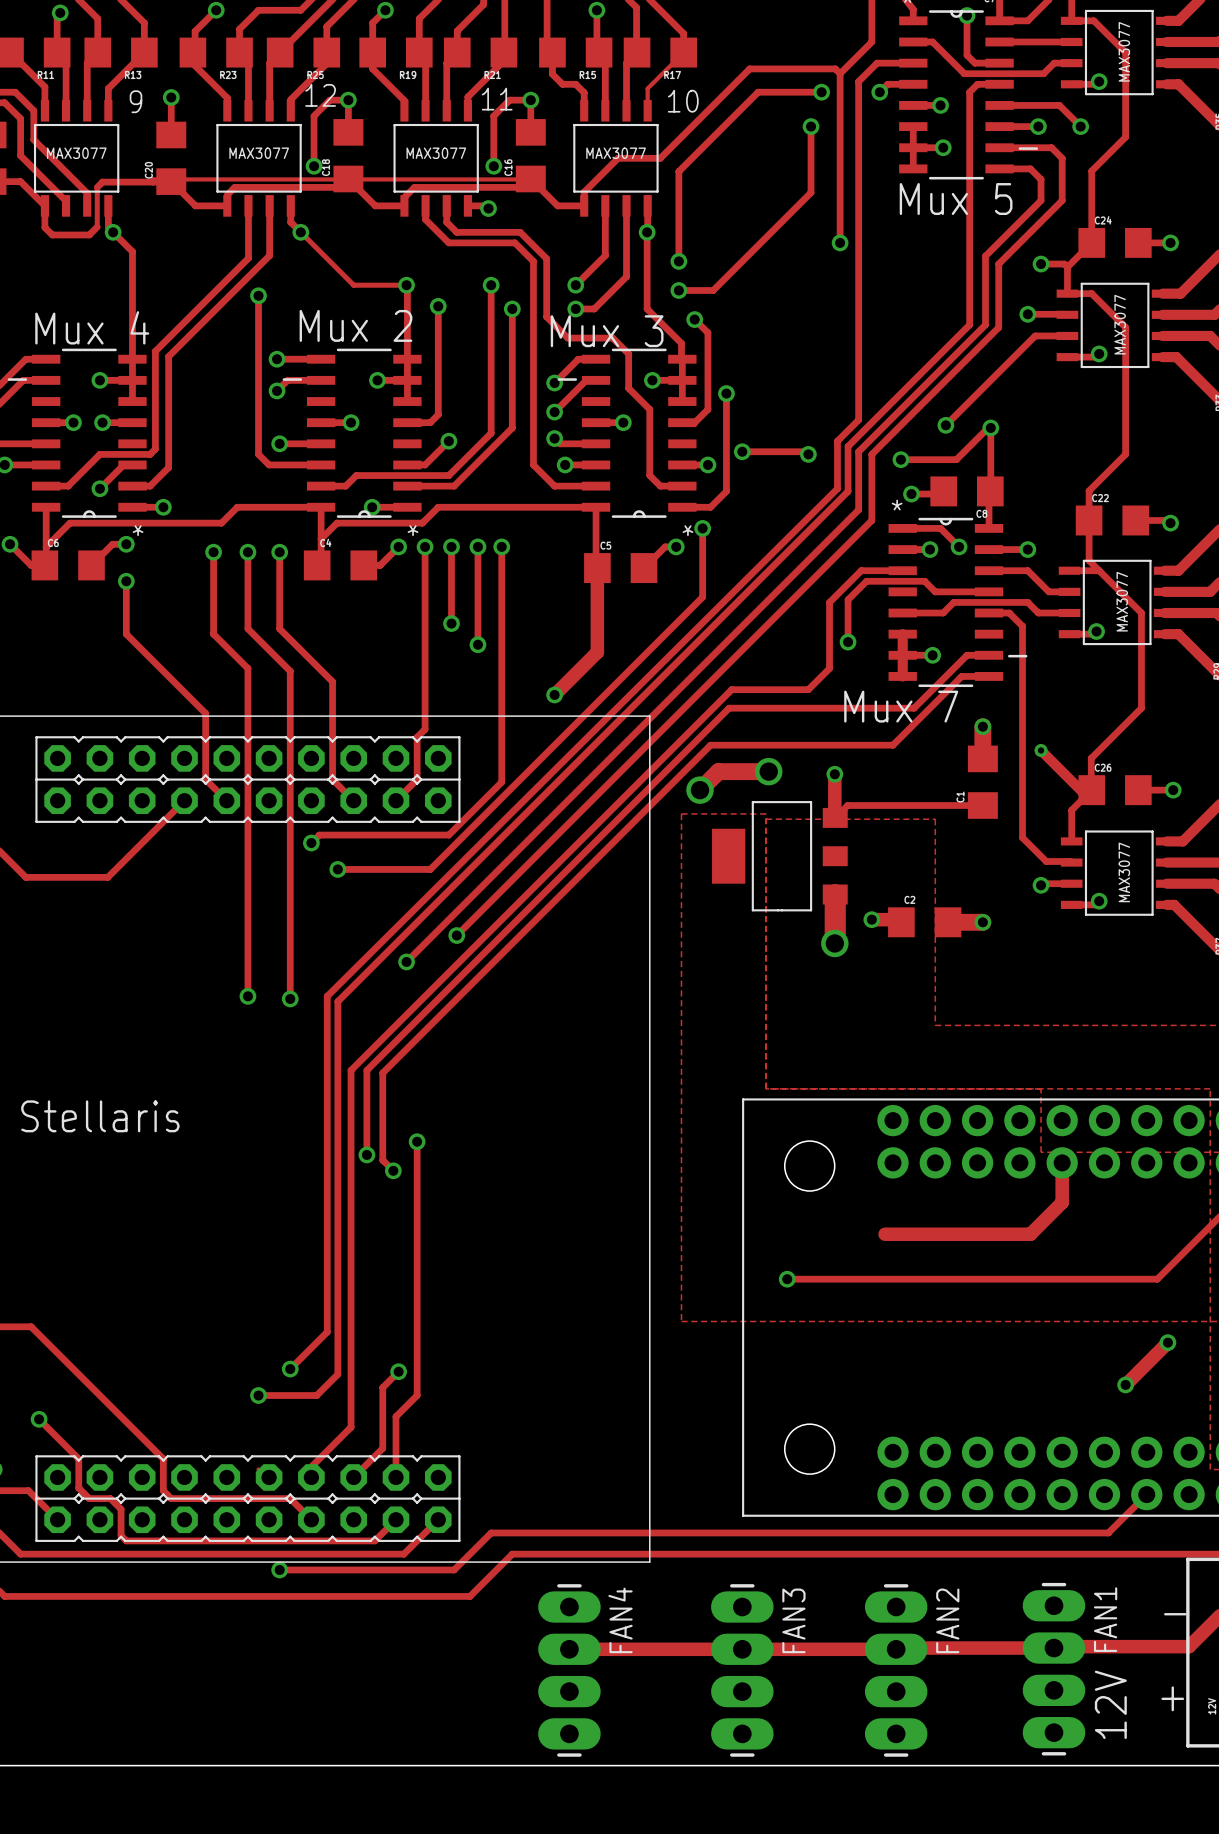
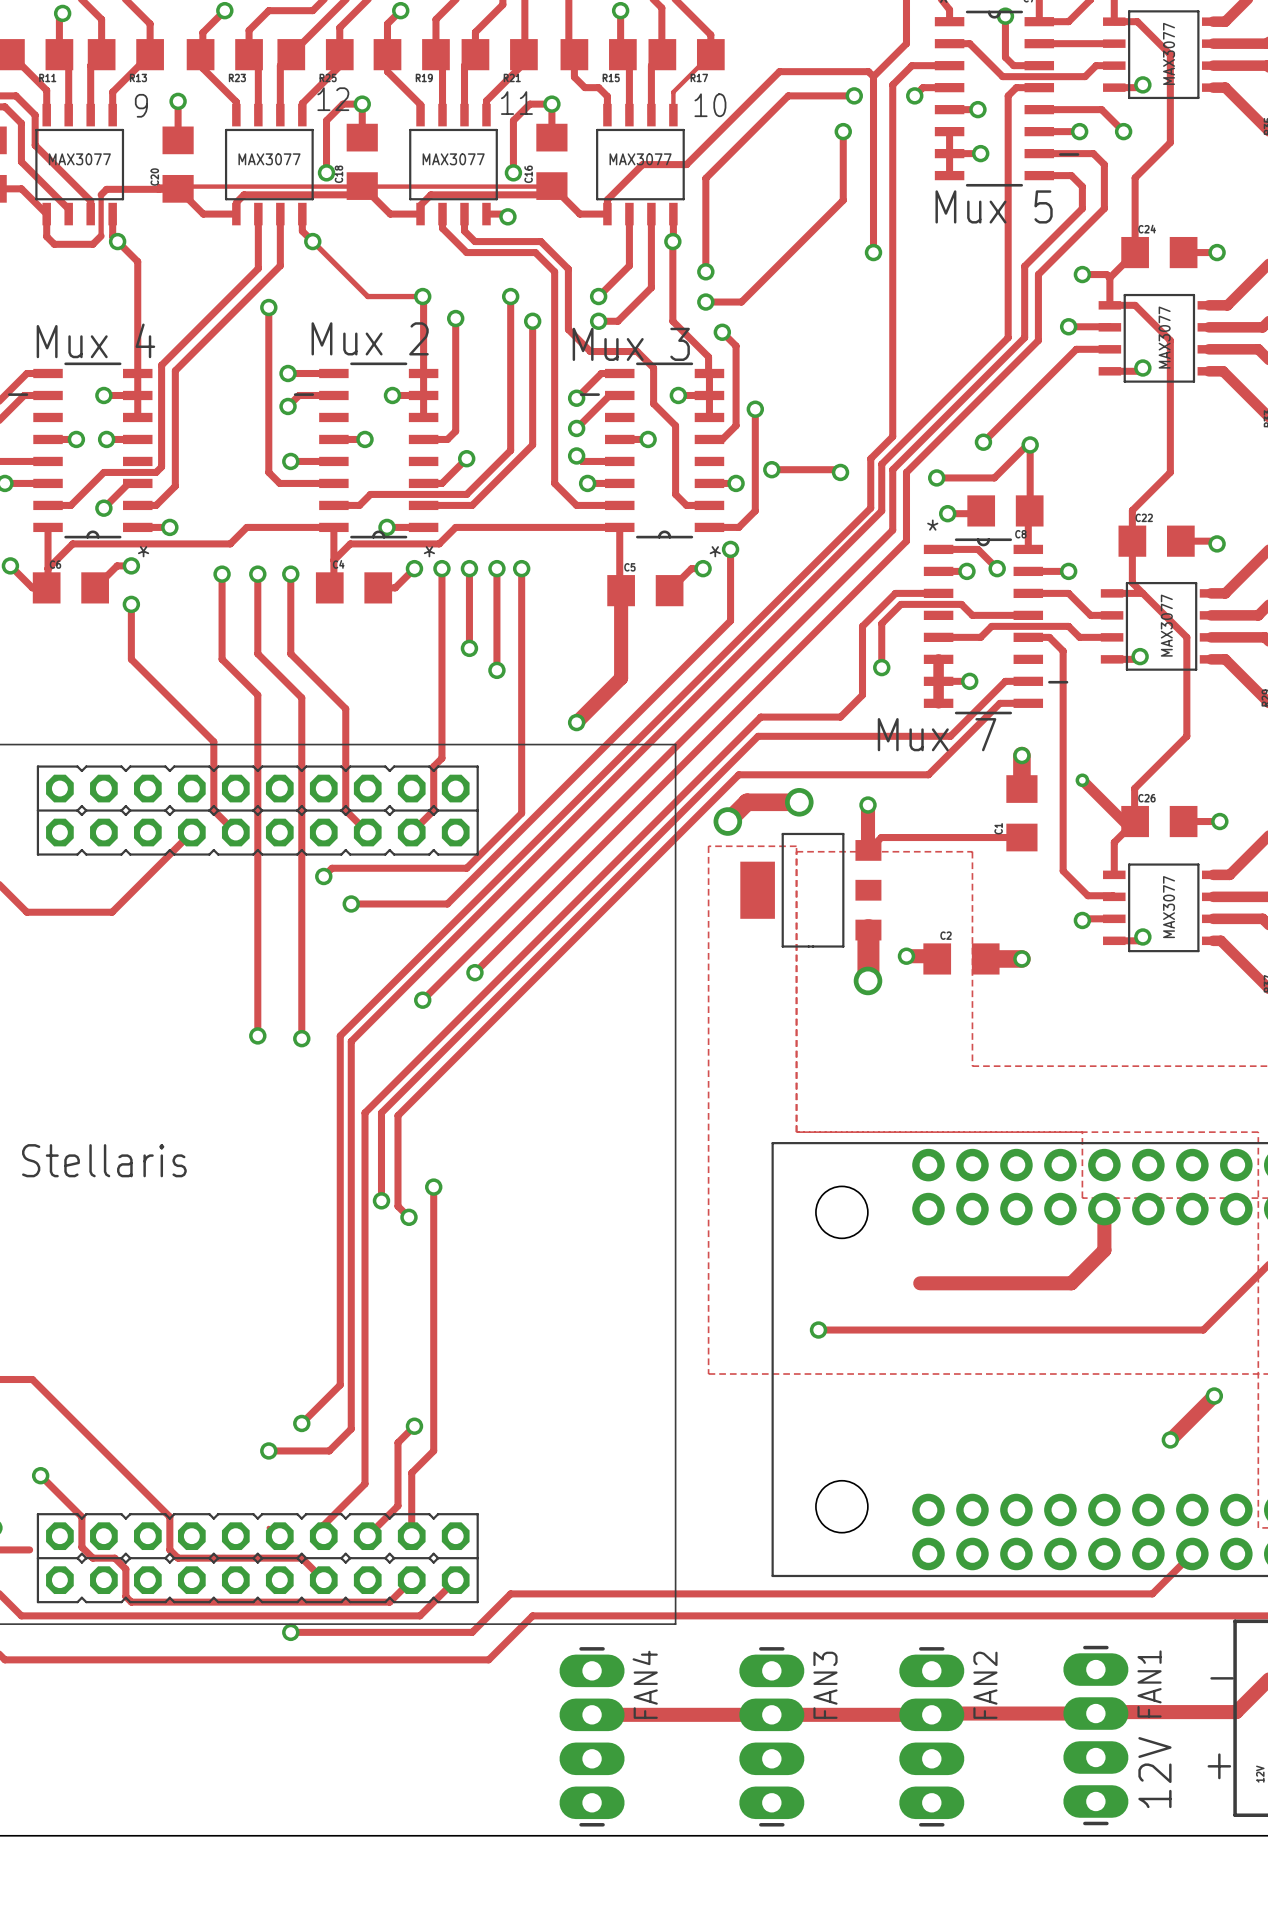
track: (28, 1490) (57, 1519) -> none

